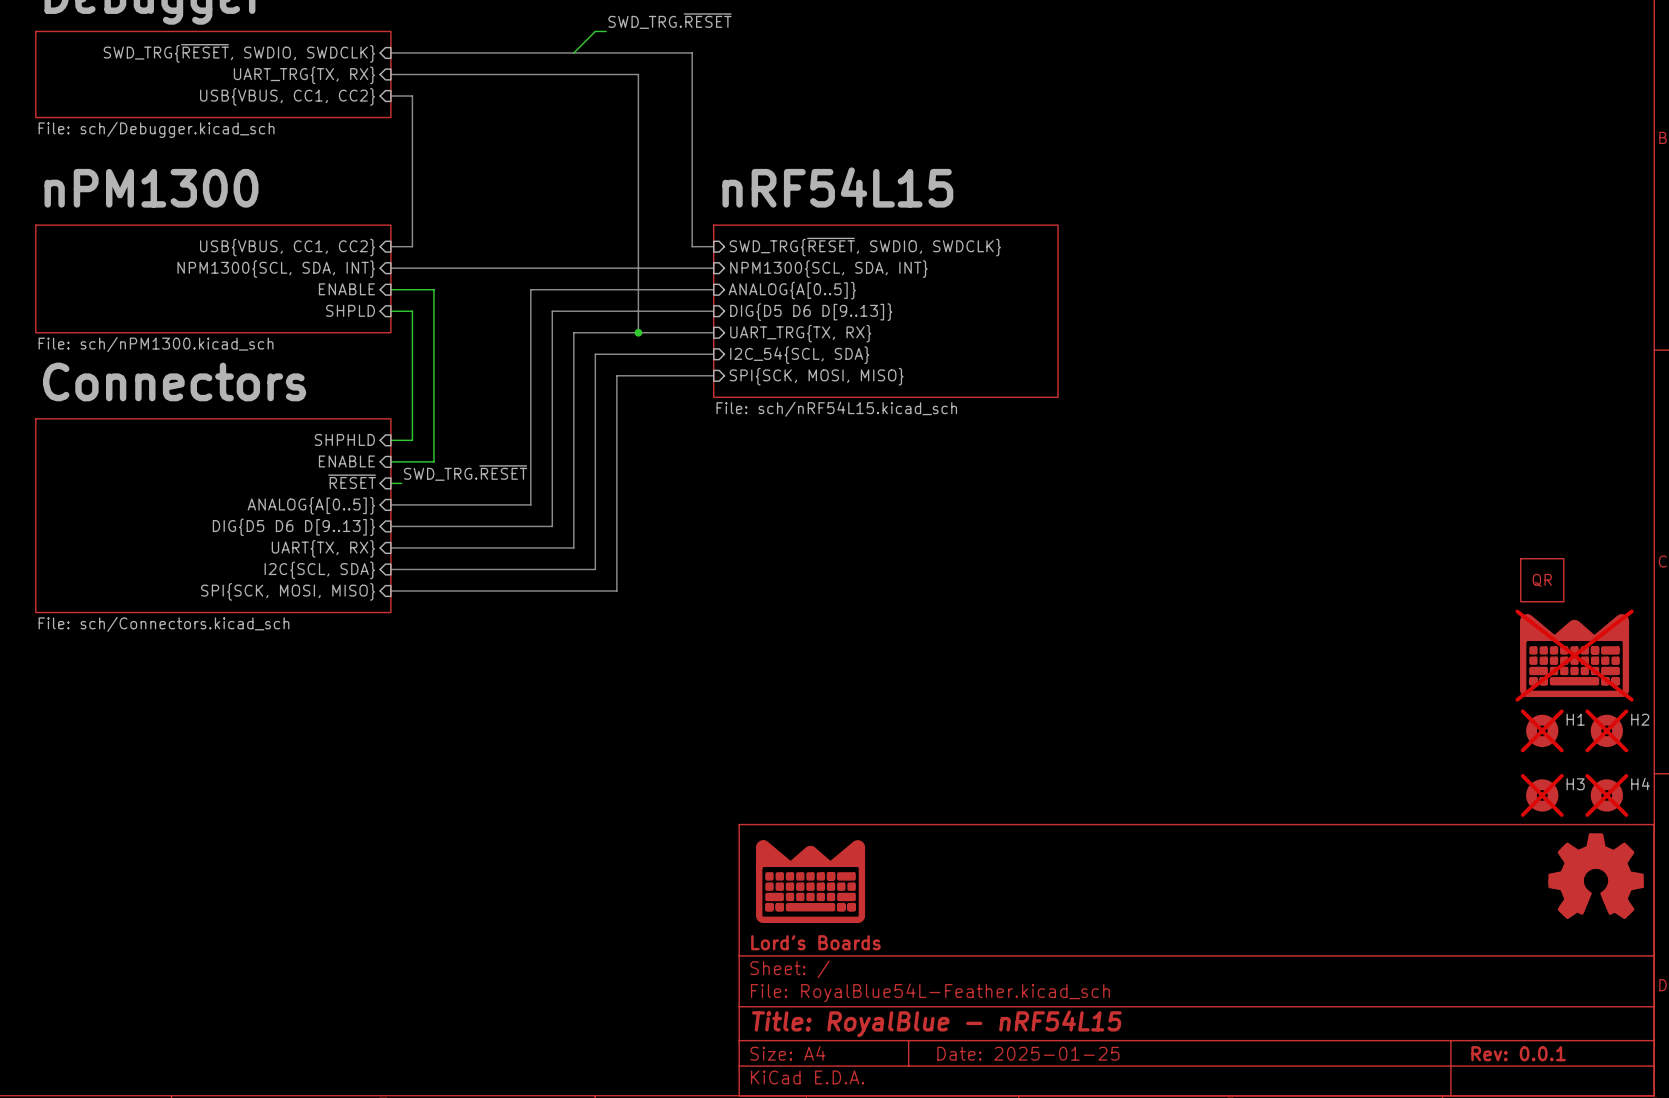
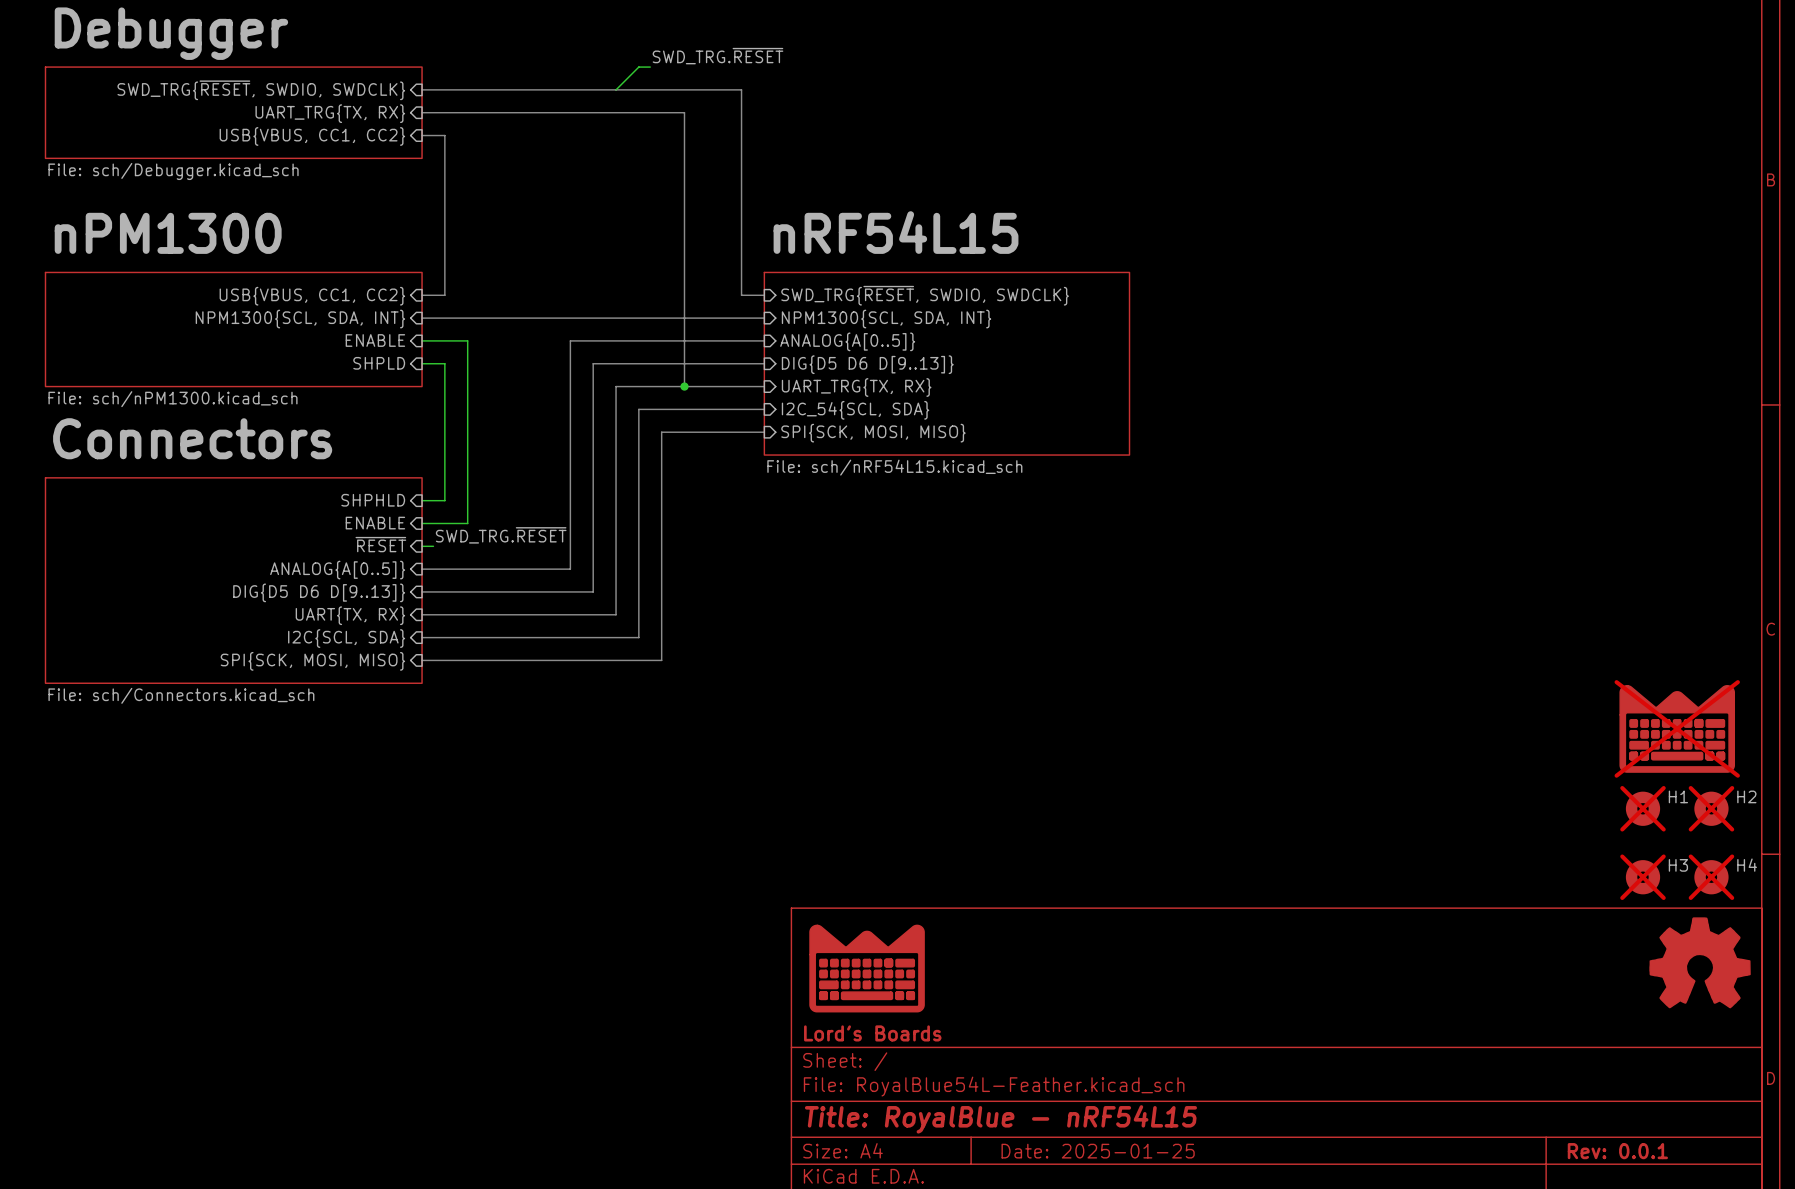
part: (1542, 580) -> none

